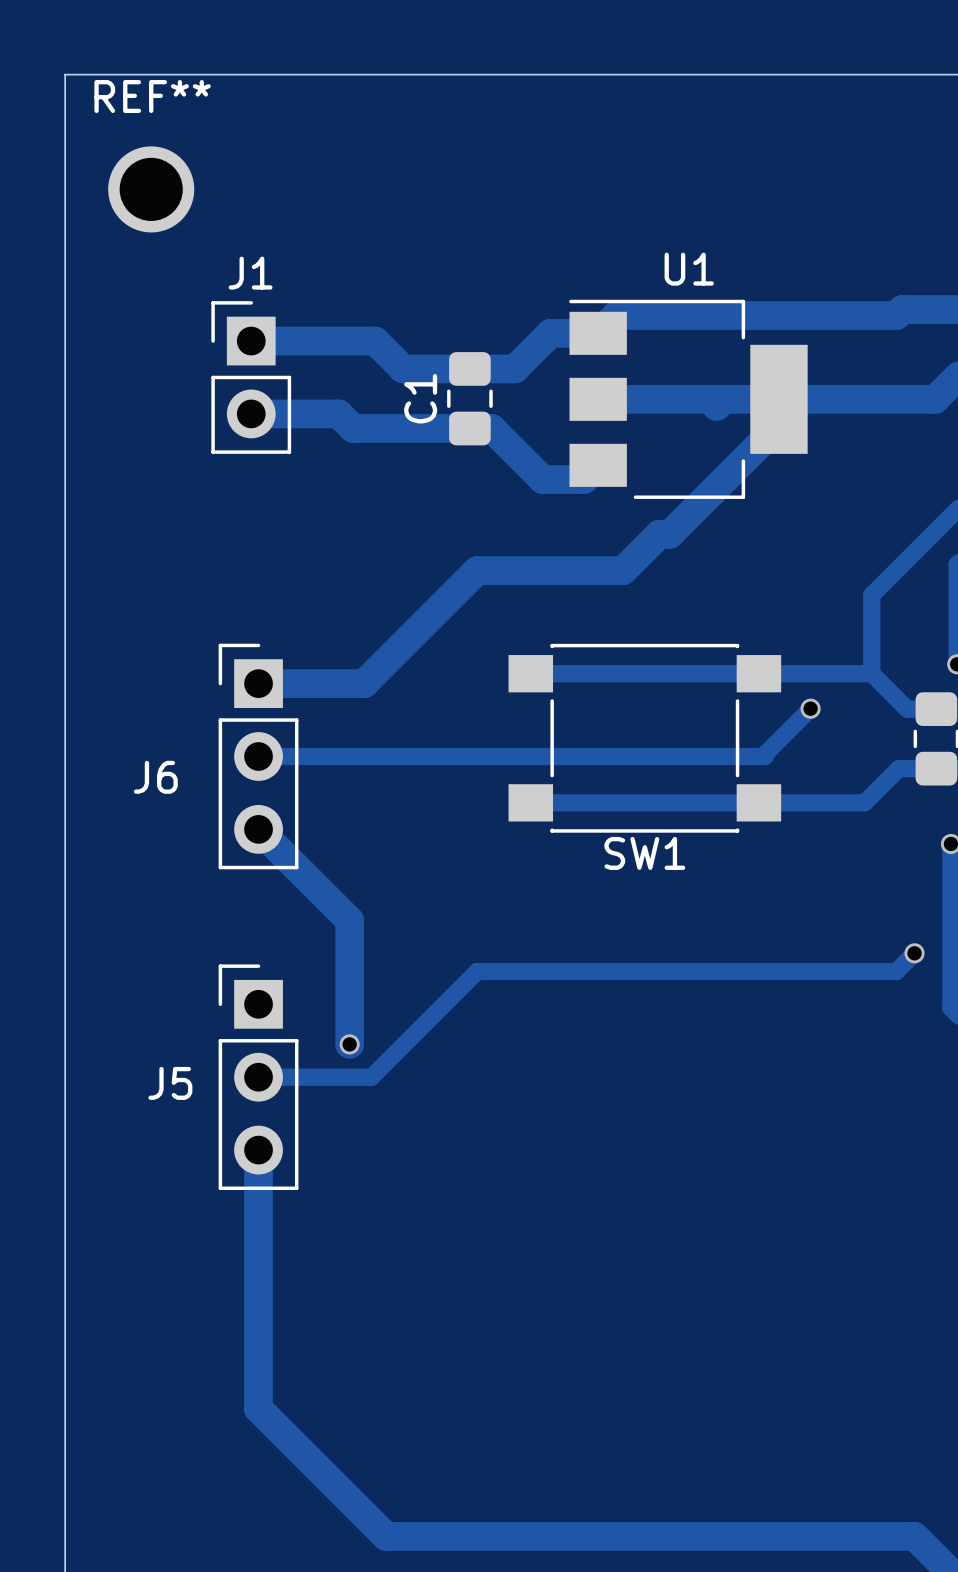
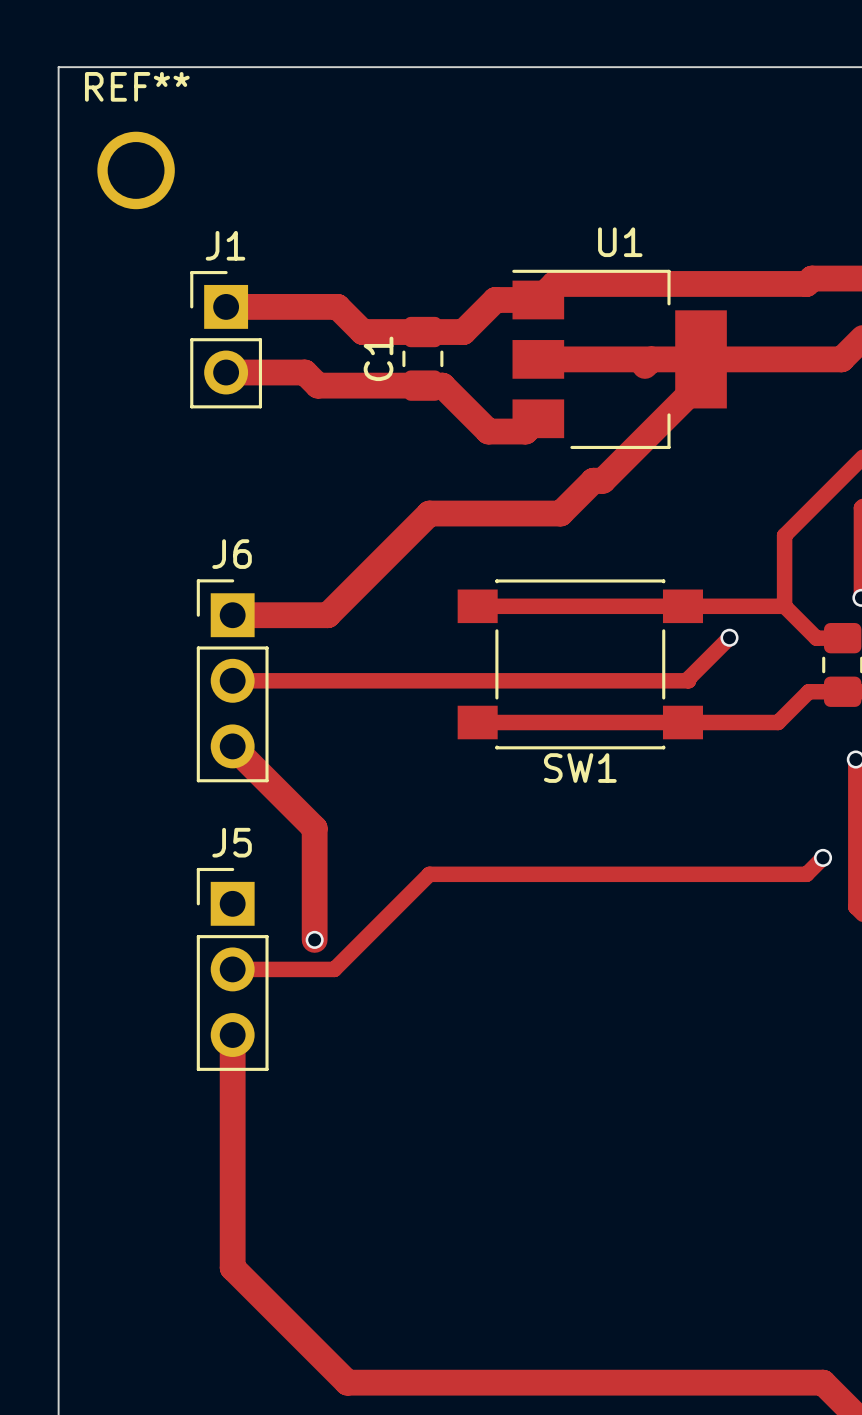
J6 name position: J6 (155, 777) -> J6 (232, 554)
J5 name position: J5 (170, 1083) -> J5 (232, 842)

